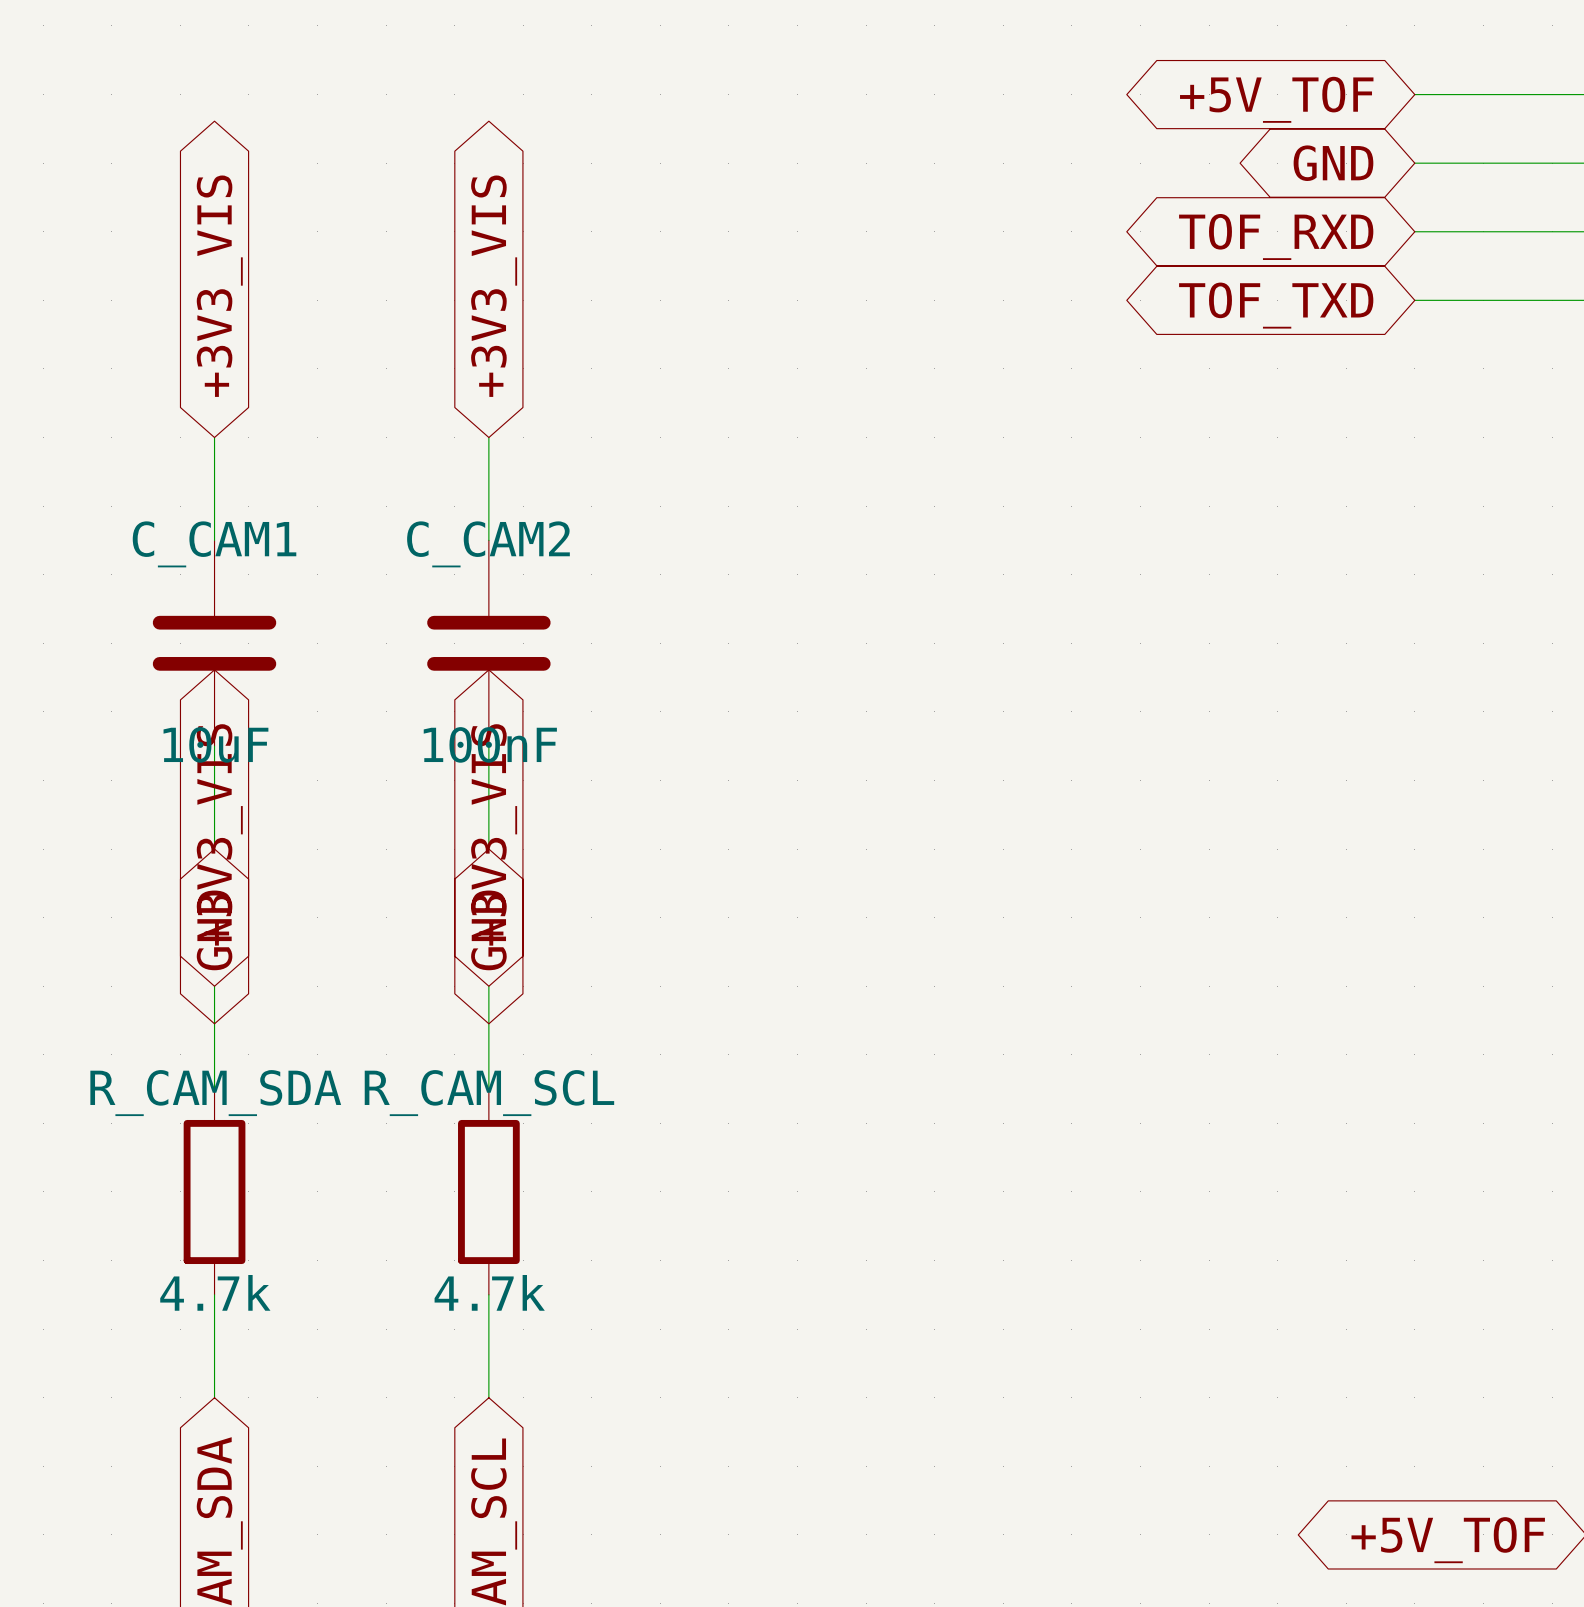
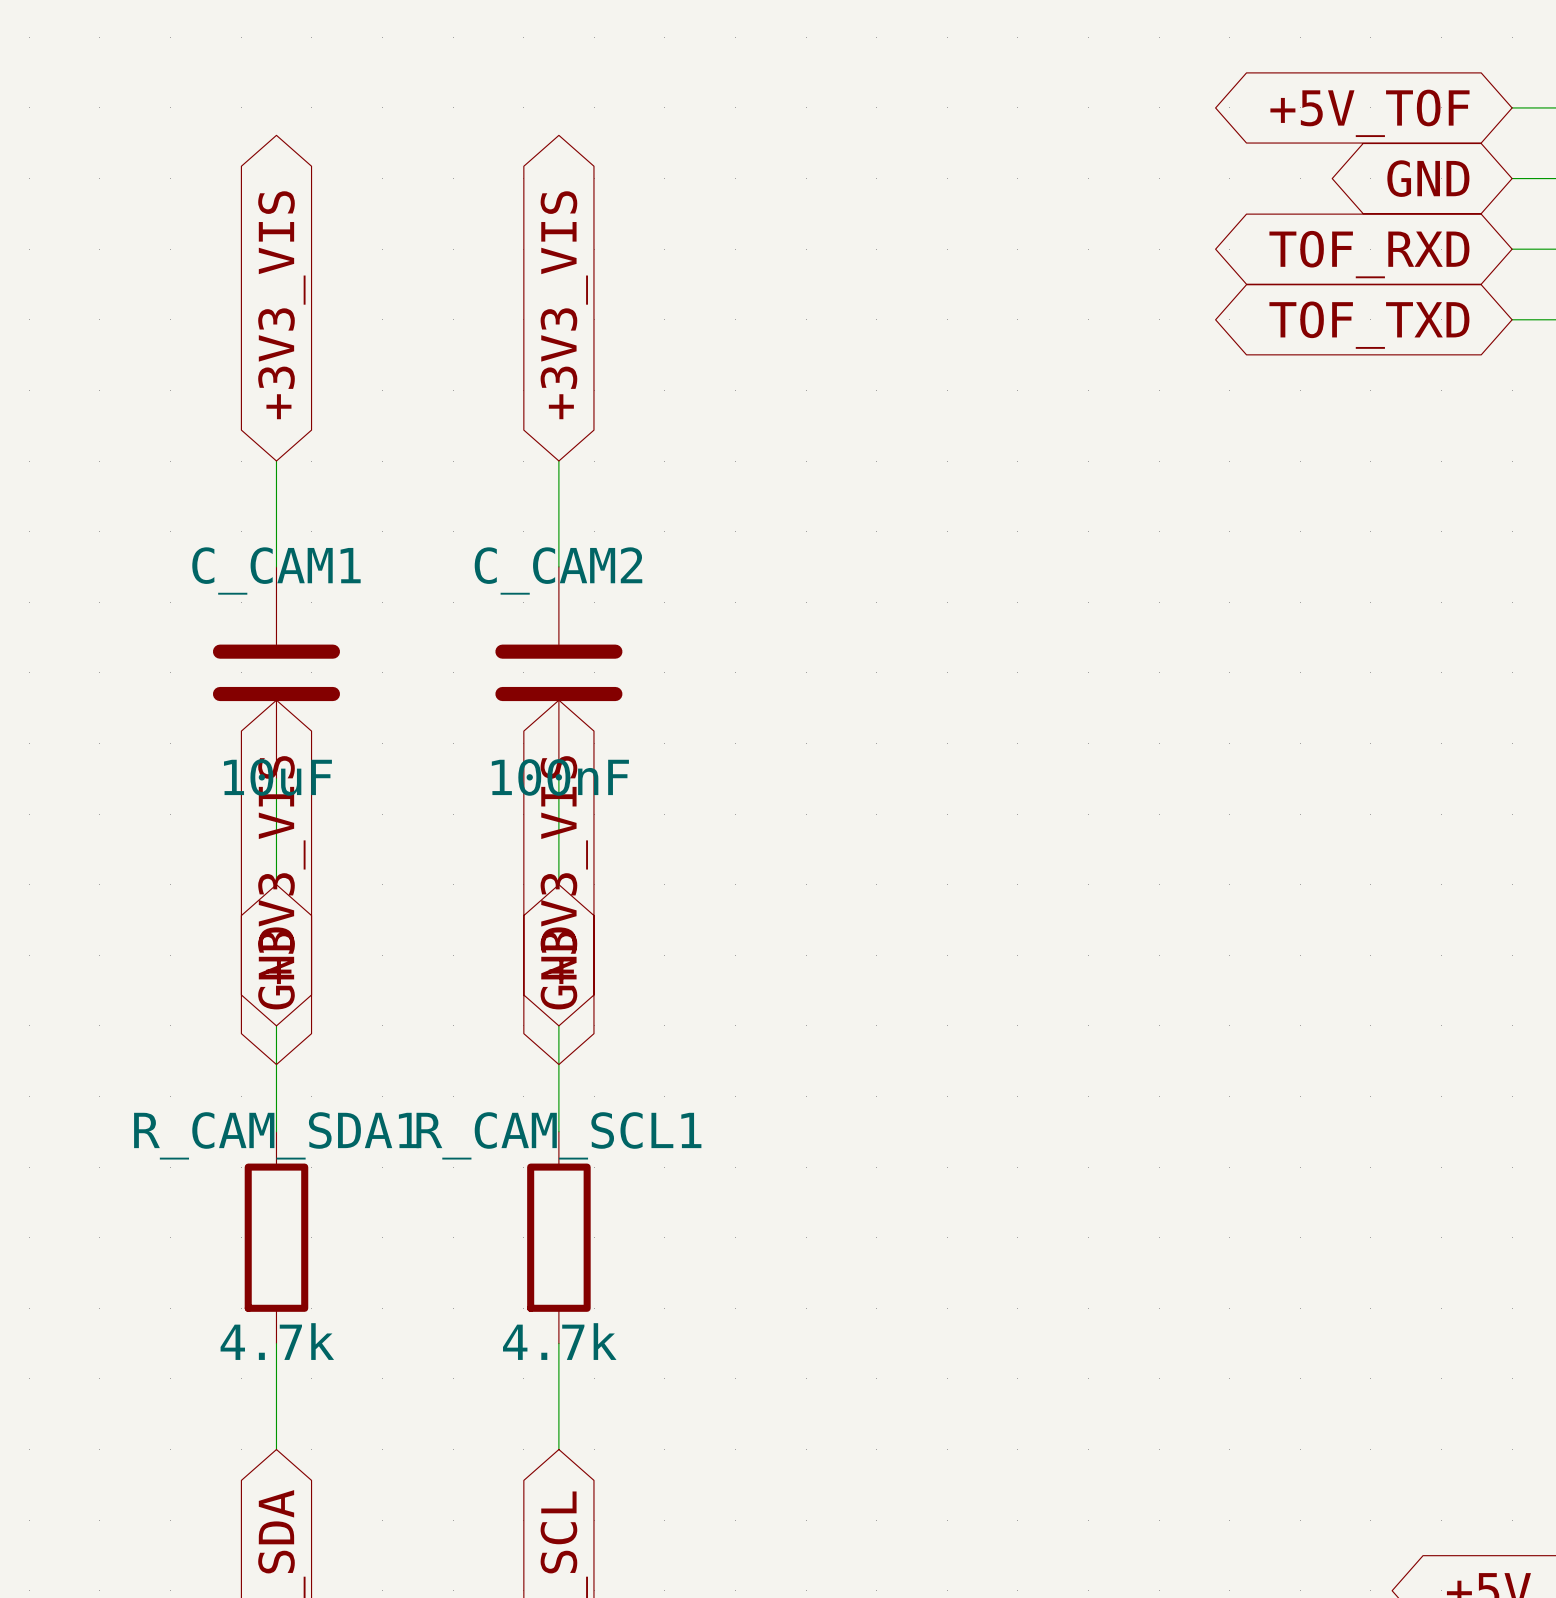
R_CAM_SDA name: R_CAM_SDA (215, 1093) -> R_CAM_SDA1 (276, 1135)
R_CAM_SCL name: R_CAM_SCL (489, 1093) -> R_CAM_SCL1 (558, 1135)

